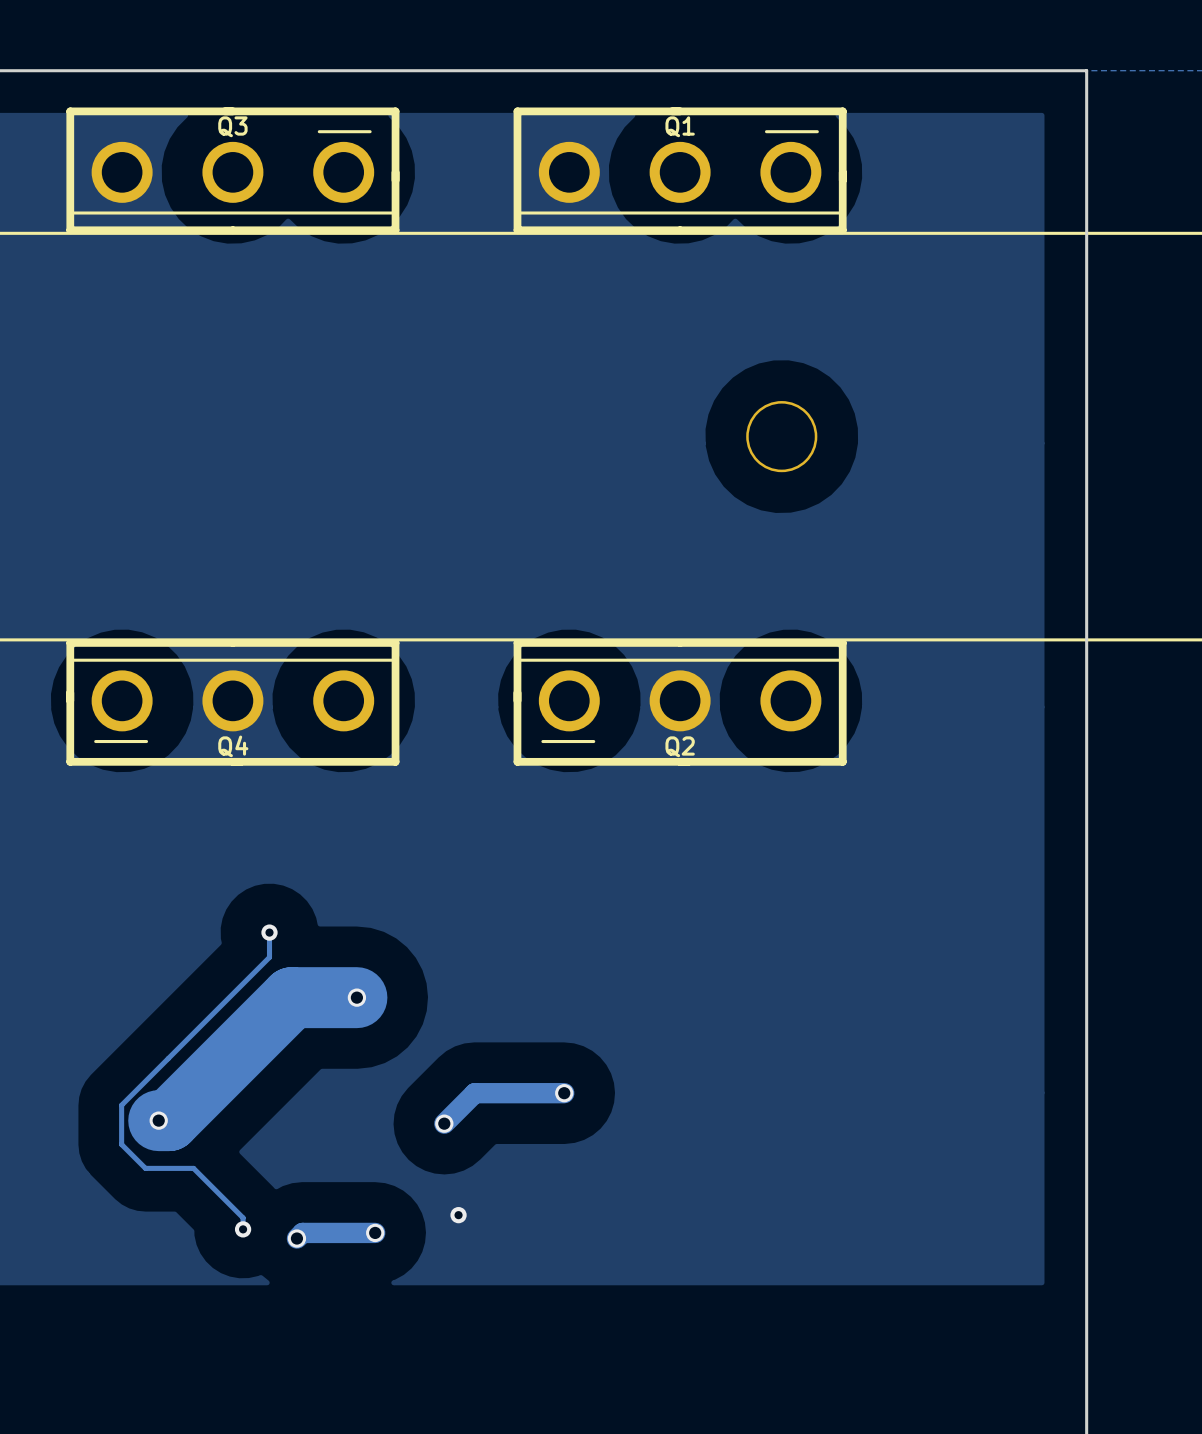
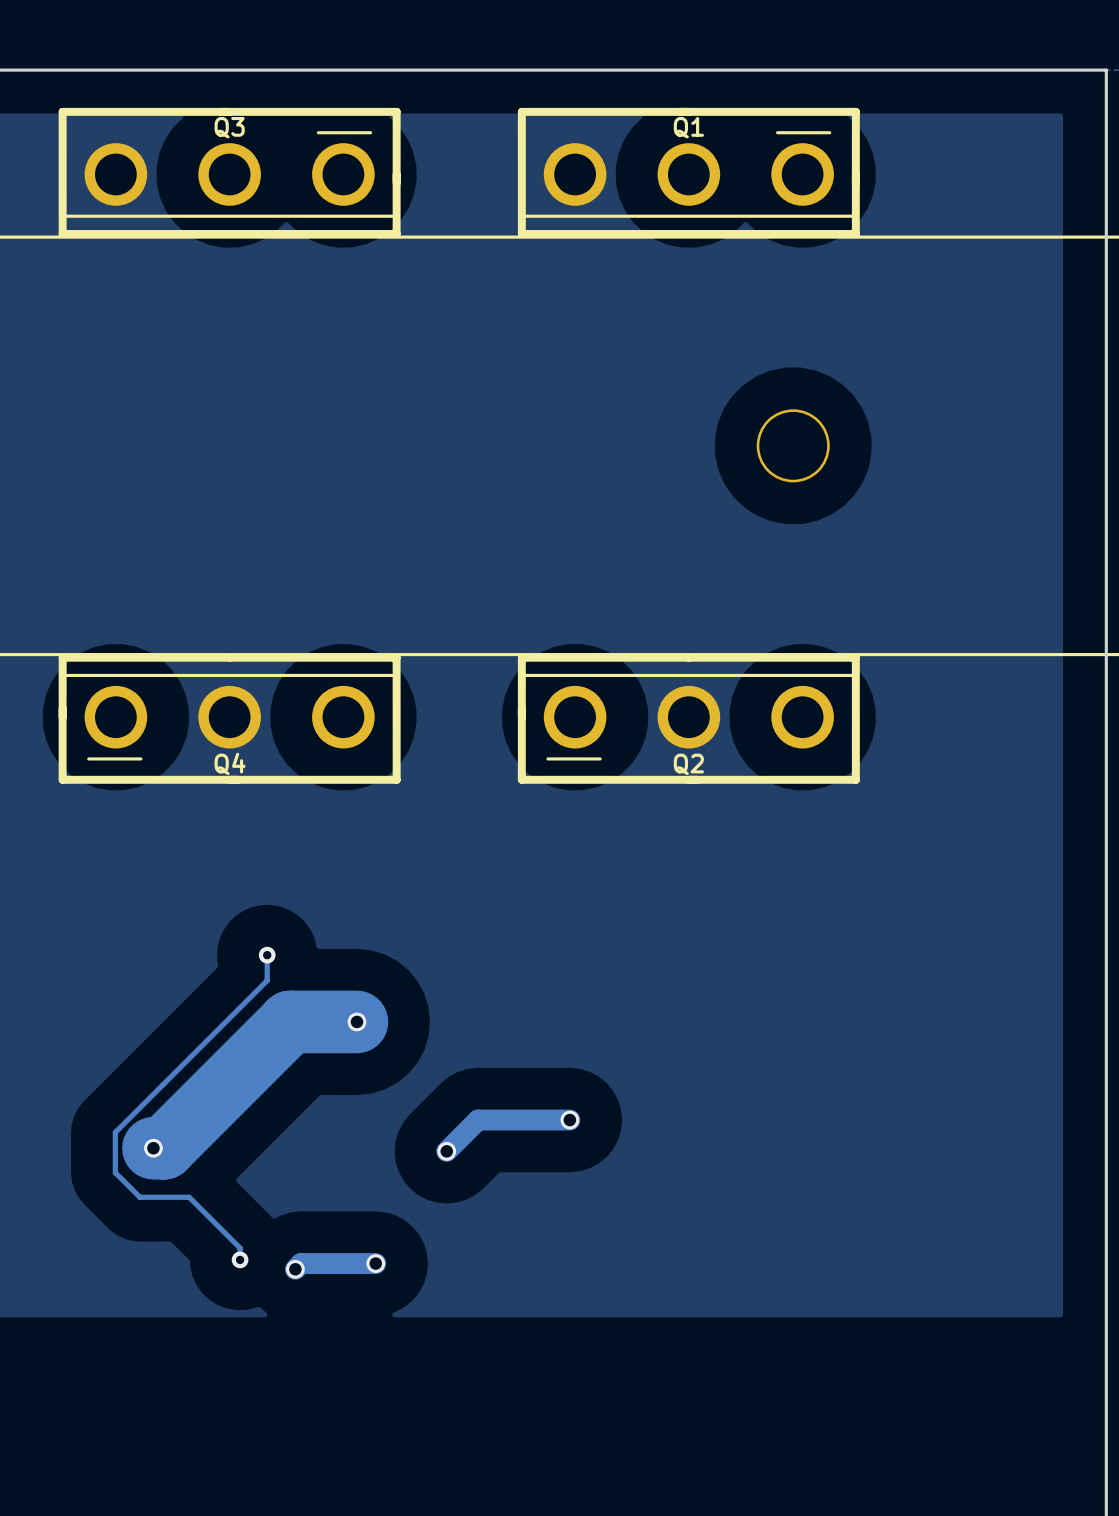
via: (458, 1215) -> none

